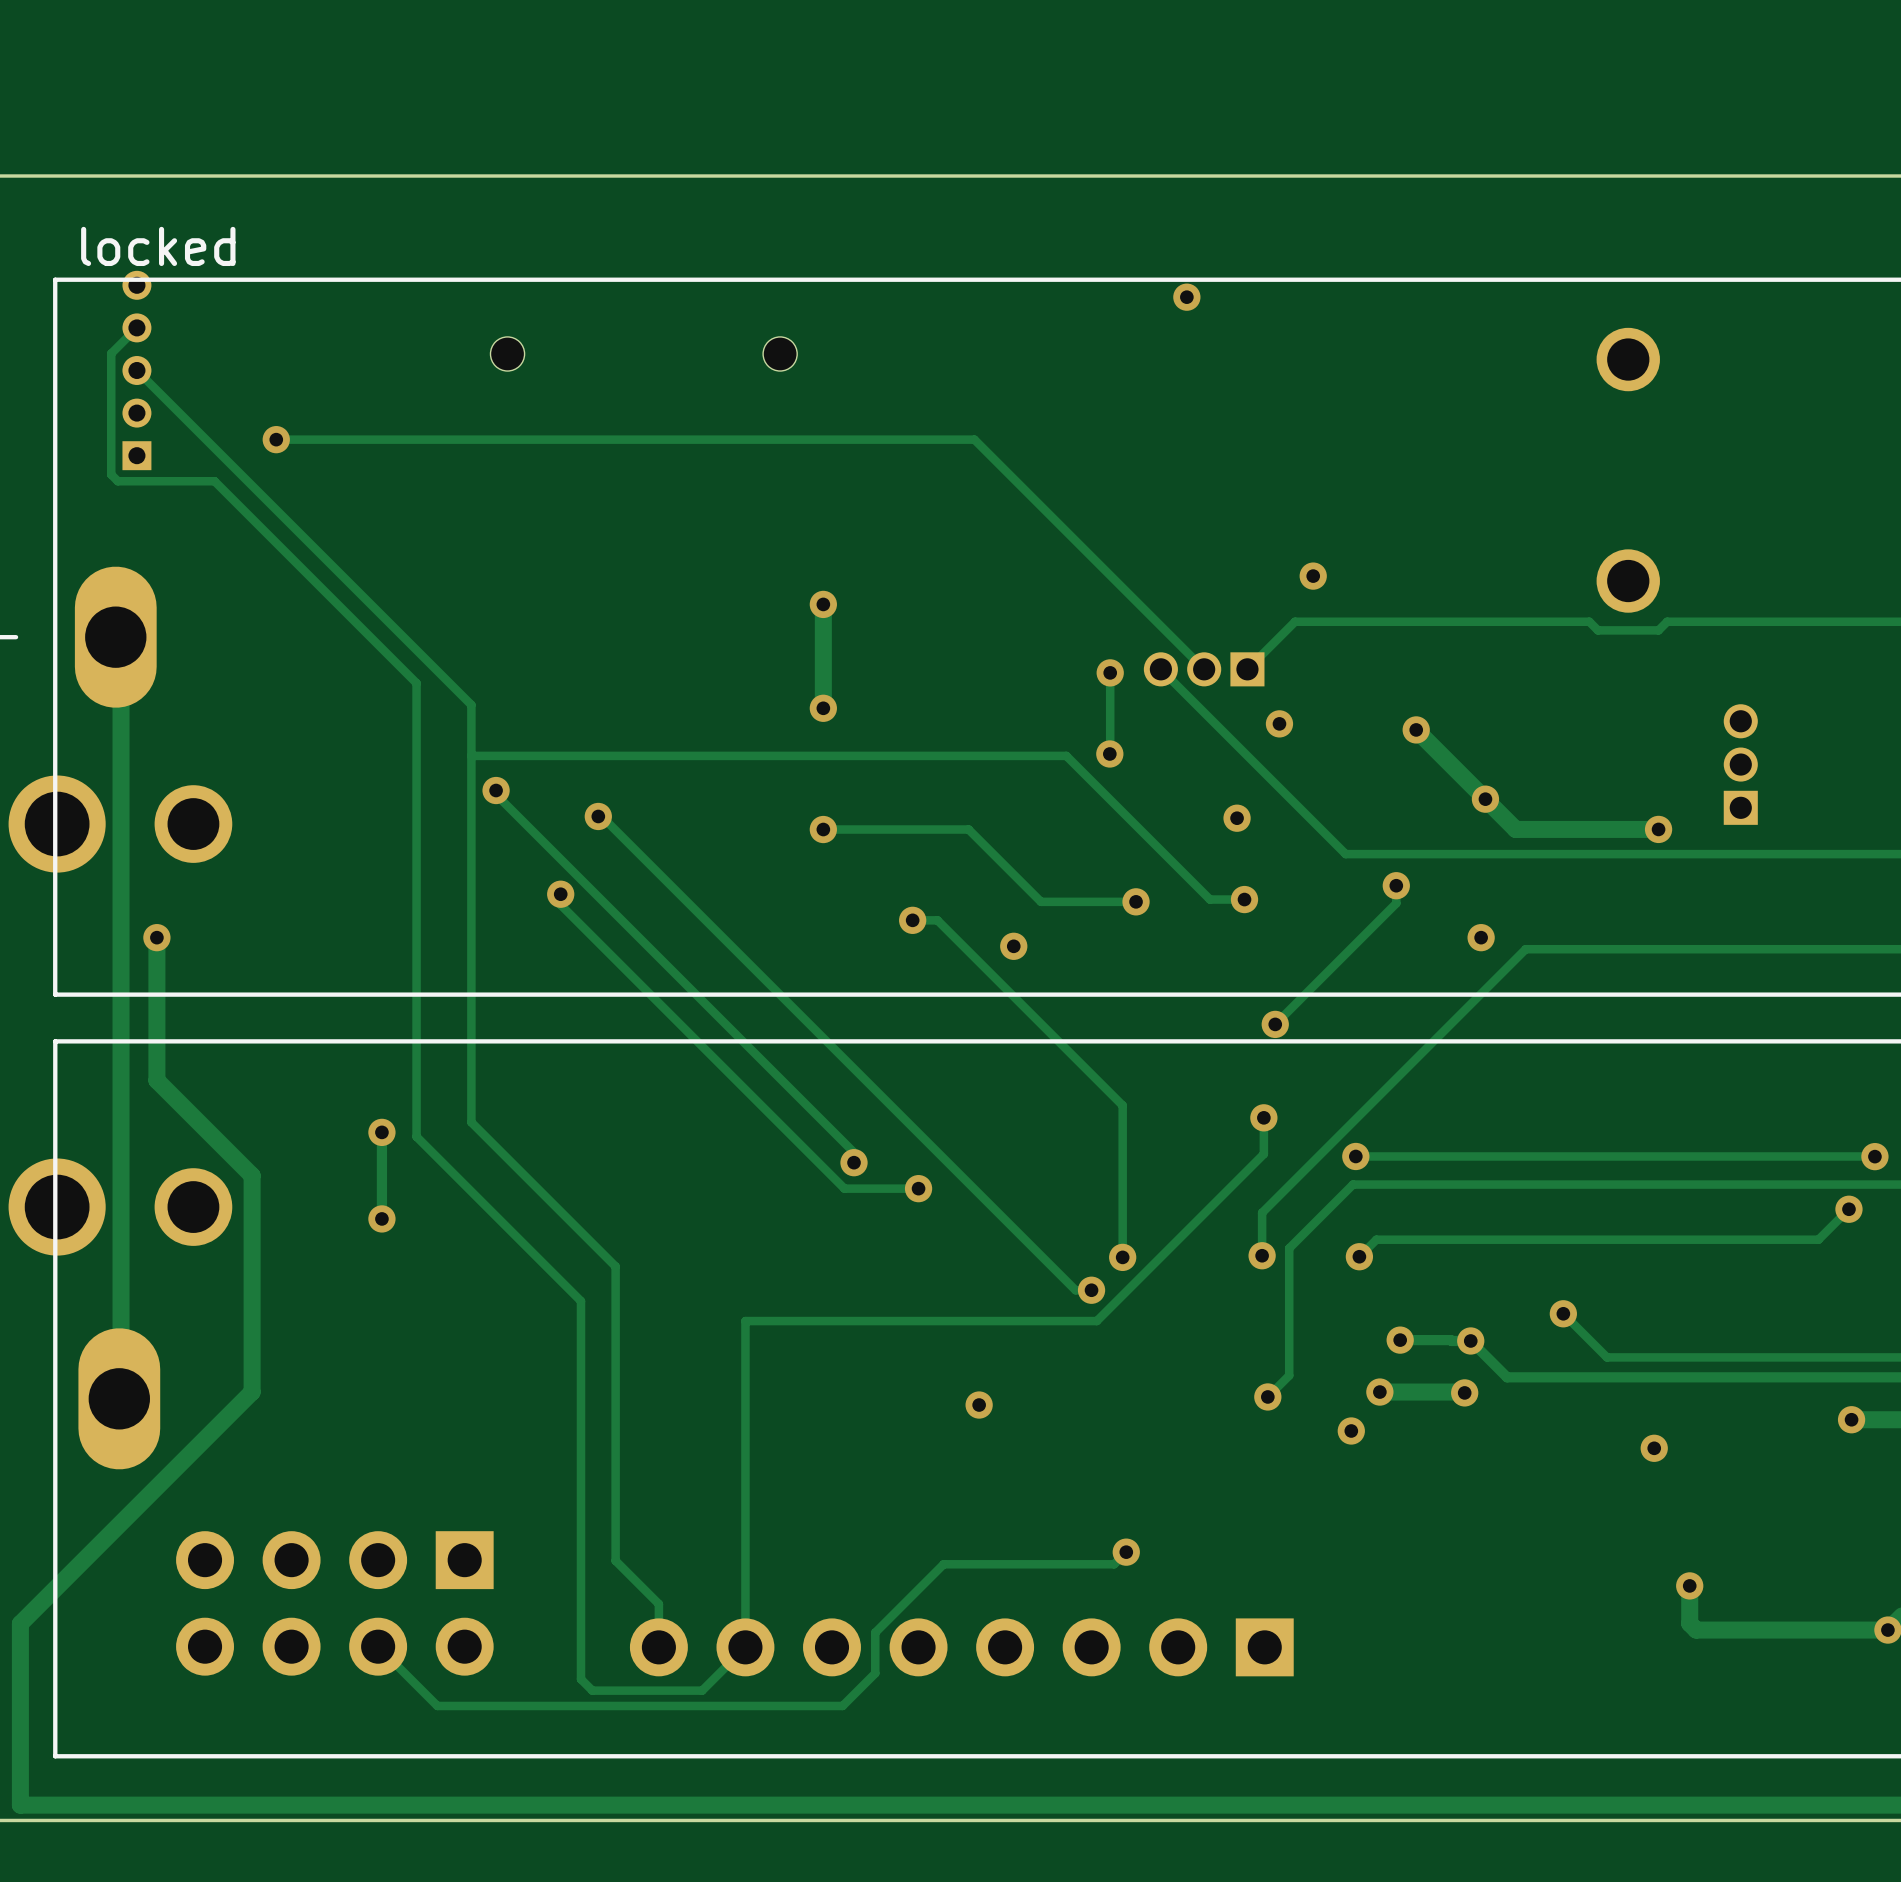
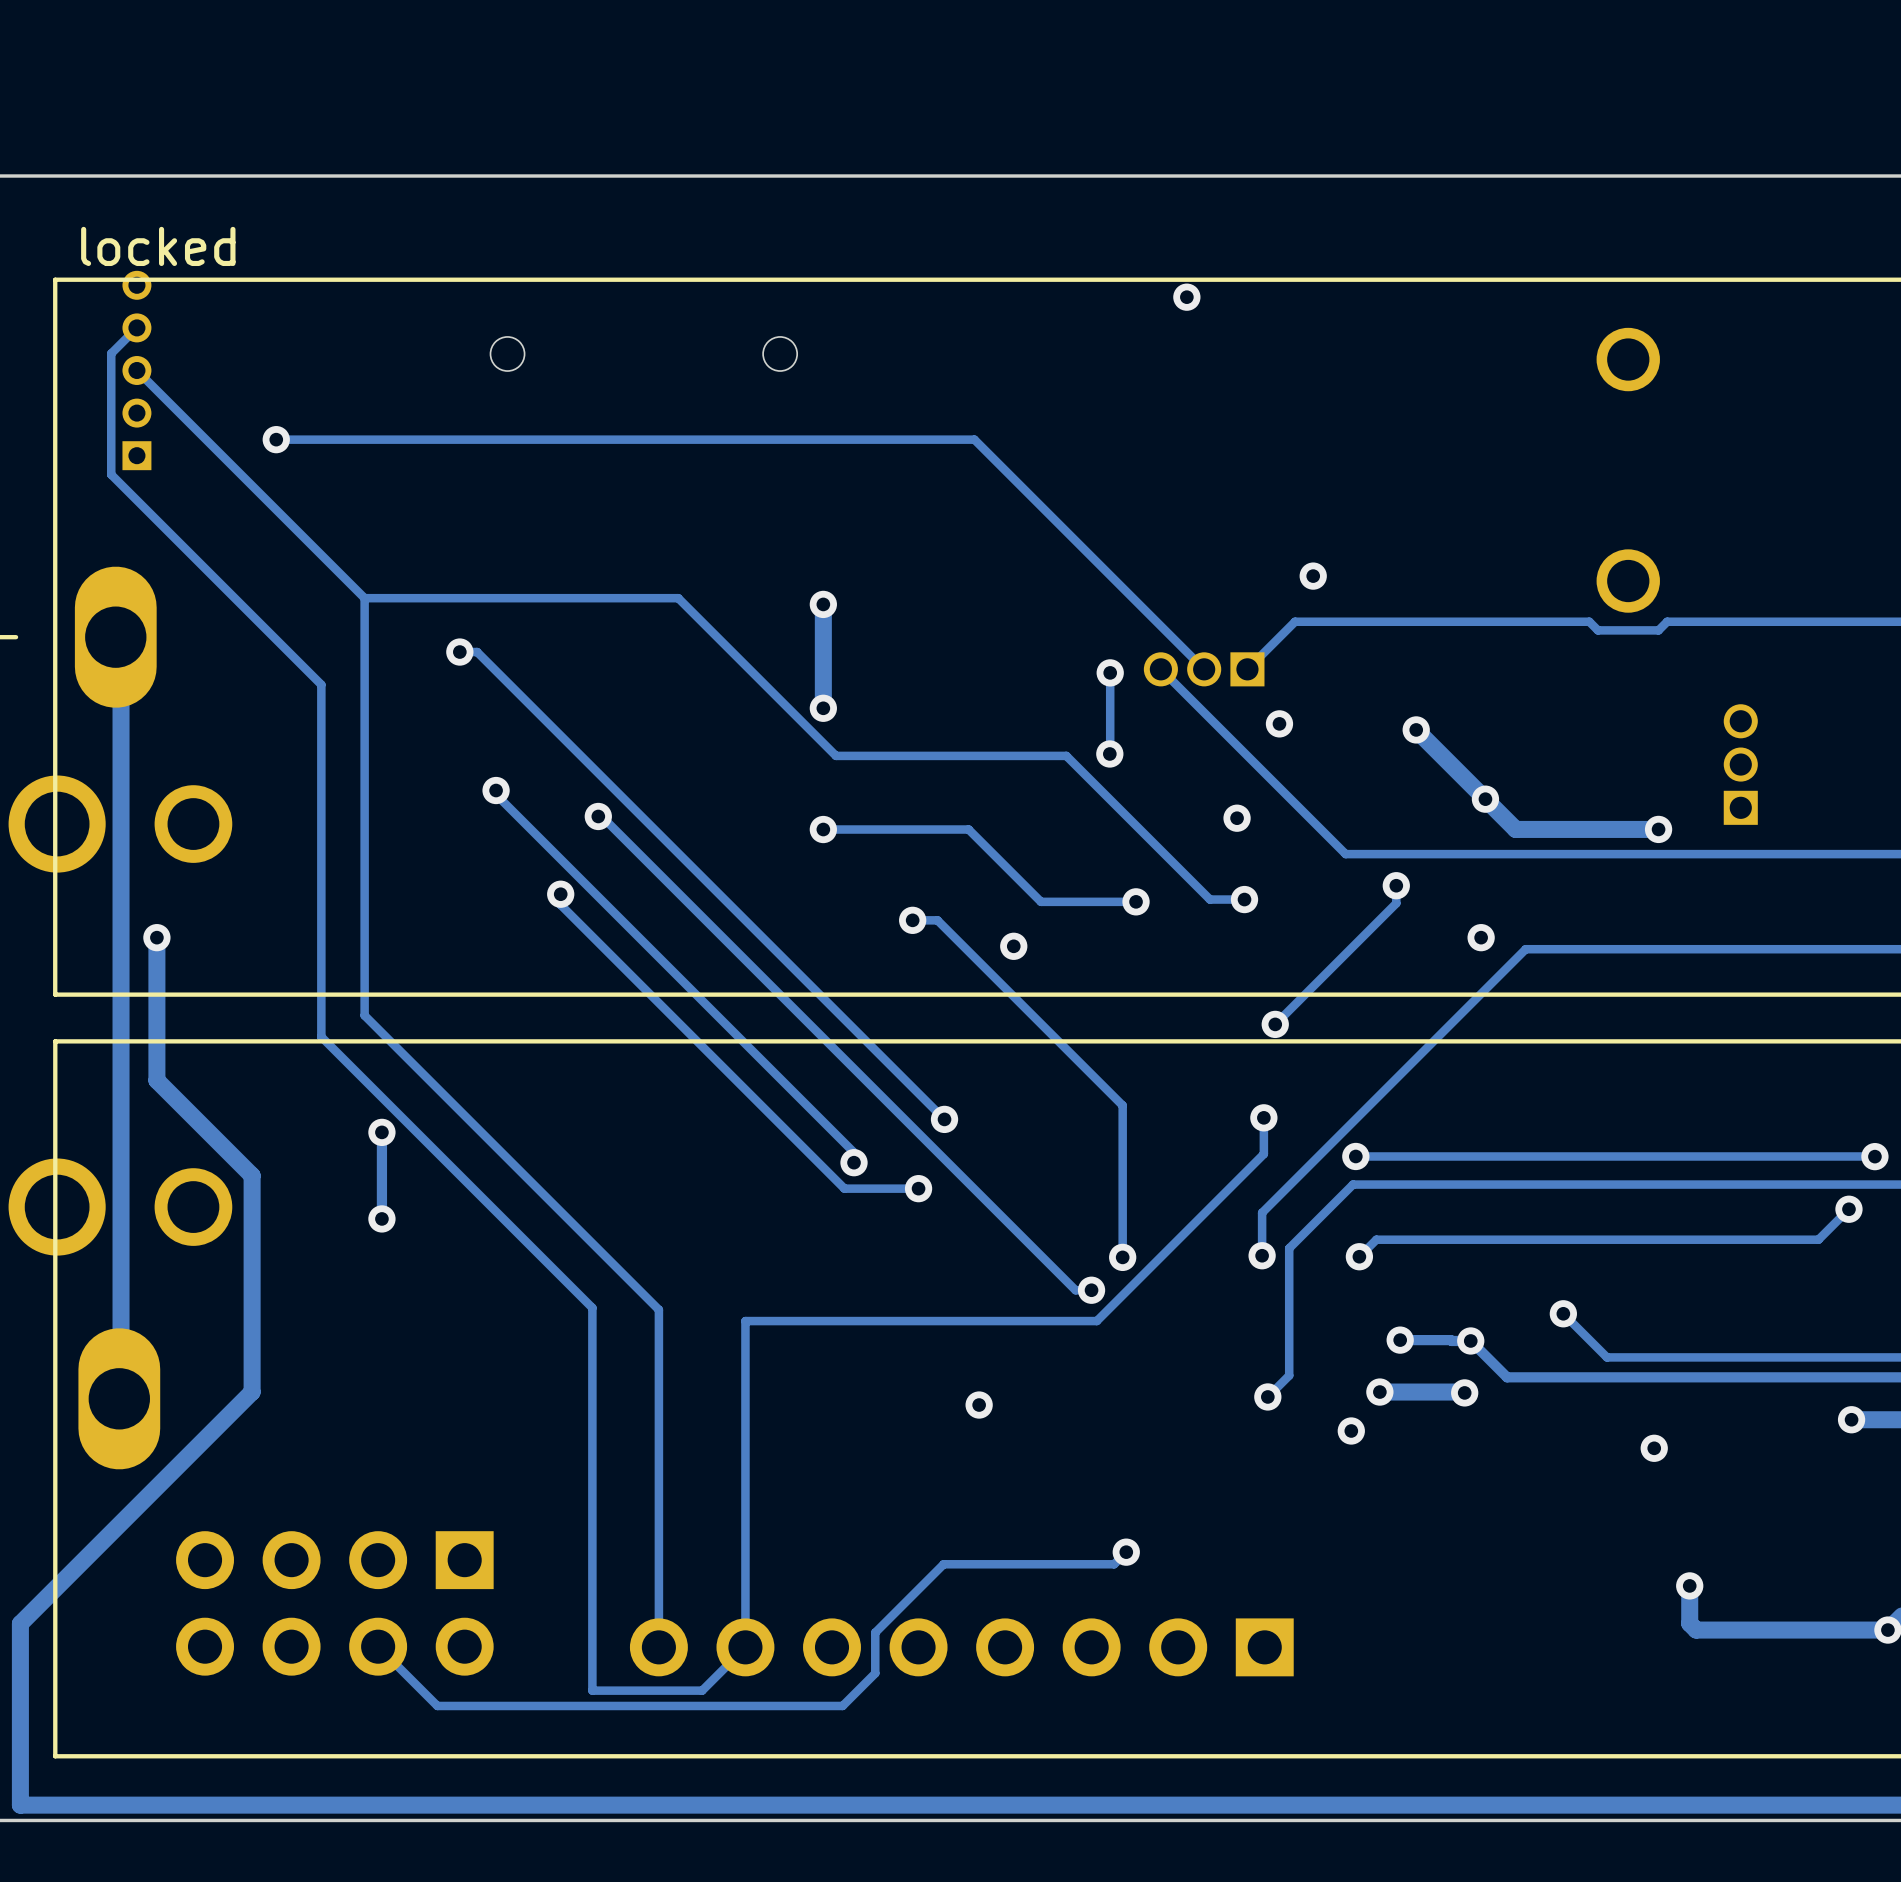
track: (117, 481) (214, 481) (416, 683) (416, 1136) (581, 1301) (581, 1679) (592, 1690) -> (117, 481) (321, 684) (321, 1036) (592, 1307) (592, 1690)
track: (364, 598) (471, 704) (471, 1122) -> none
track: none -> (459, 652) (477, 652) (944, 1119)
via: none -> (459, 652)
track: (836, 755) (471, 755) -> (836, 755) (678, 598) (364, 598) (364, 1015) (471, 1122)
via: none -> (944, 1119)
track: (615, 1266) (615, 1560) (658, 1604) -> (615, 1266) (658, 1309) (658, 1604)

